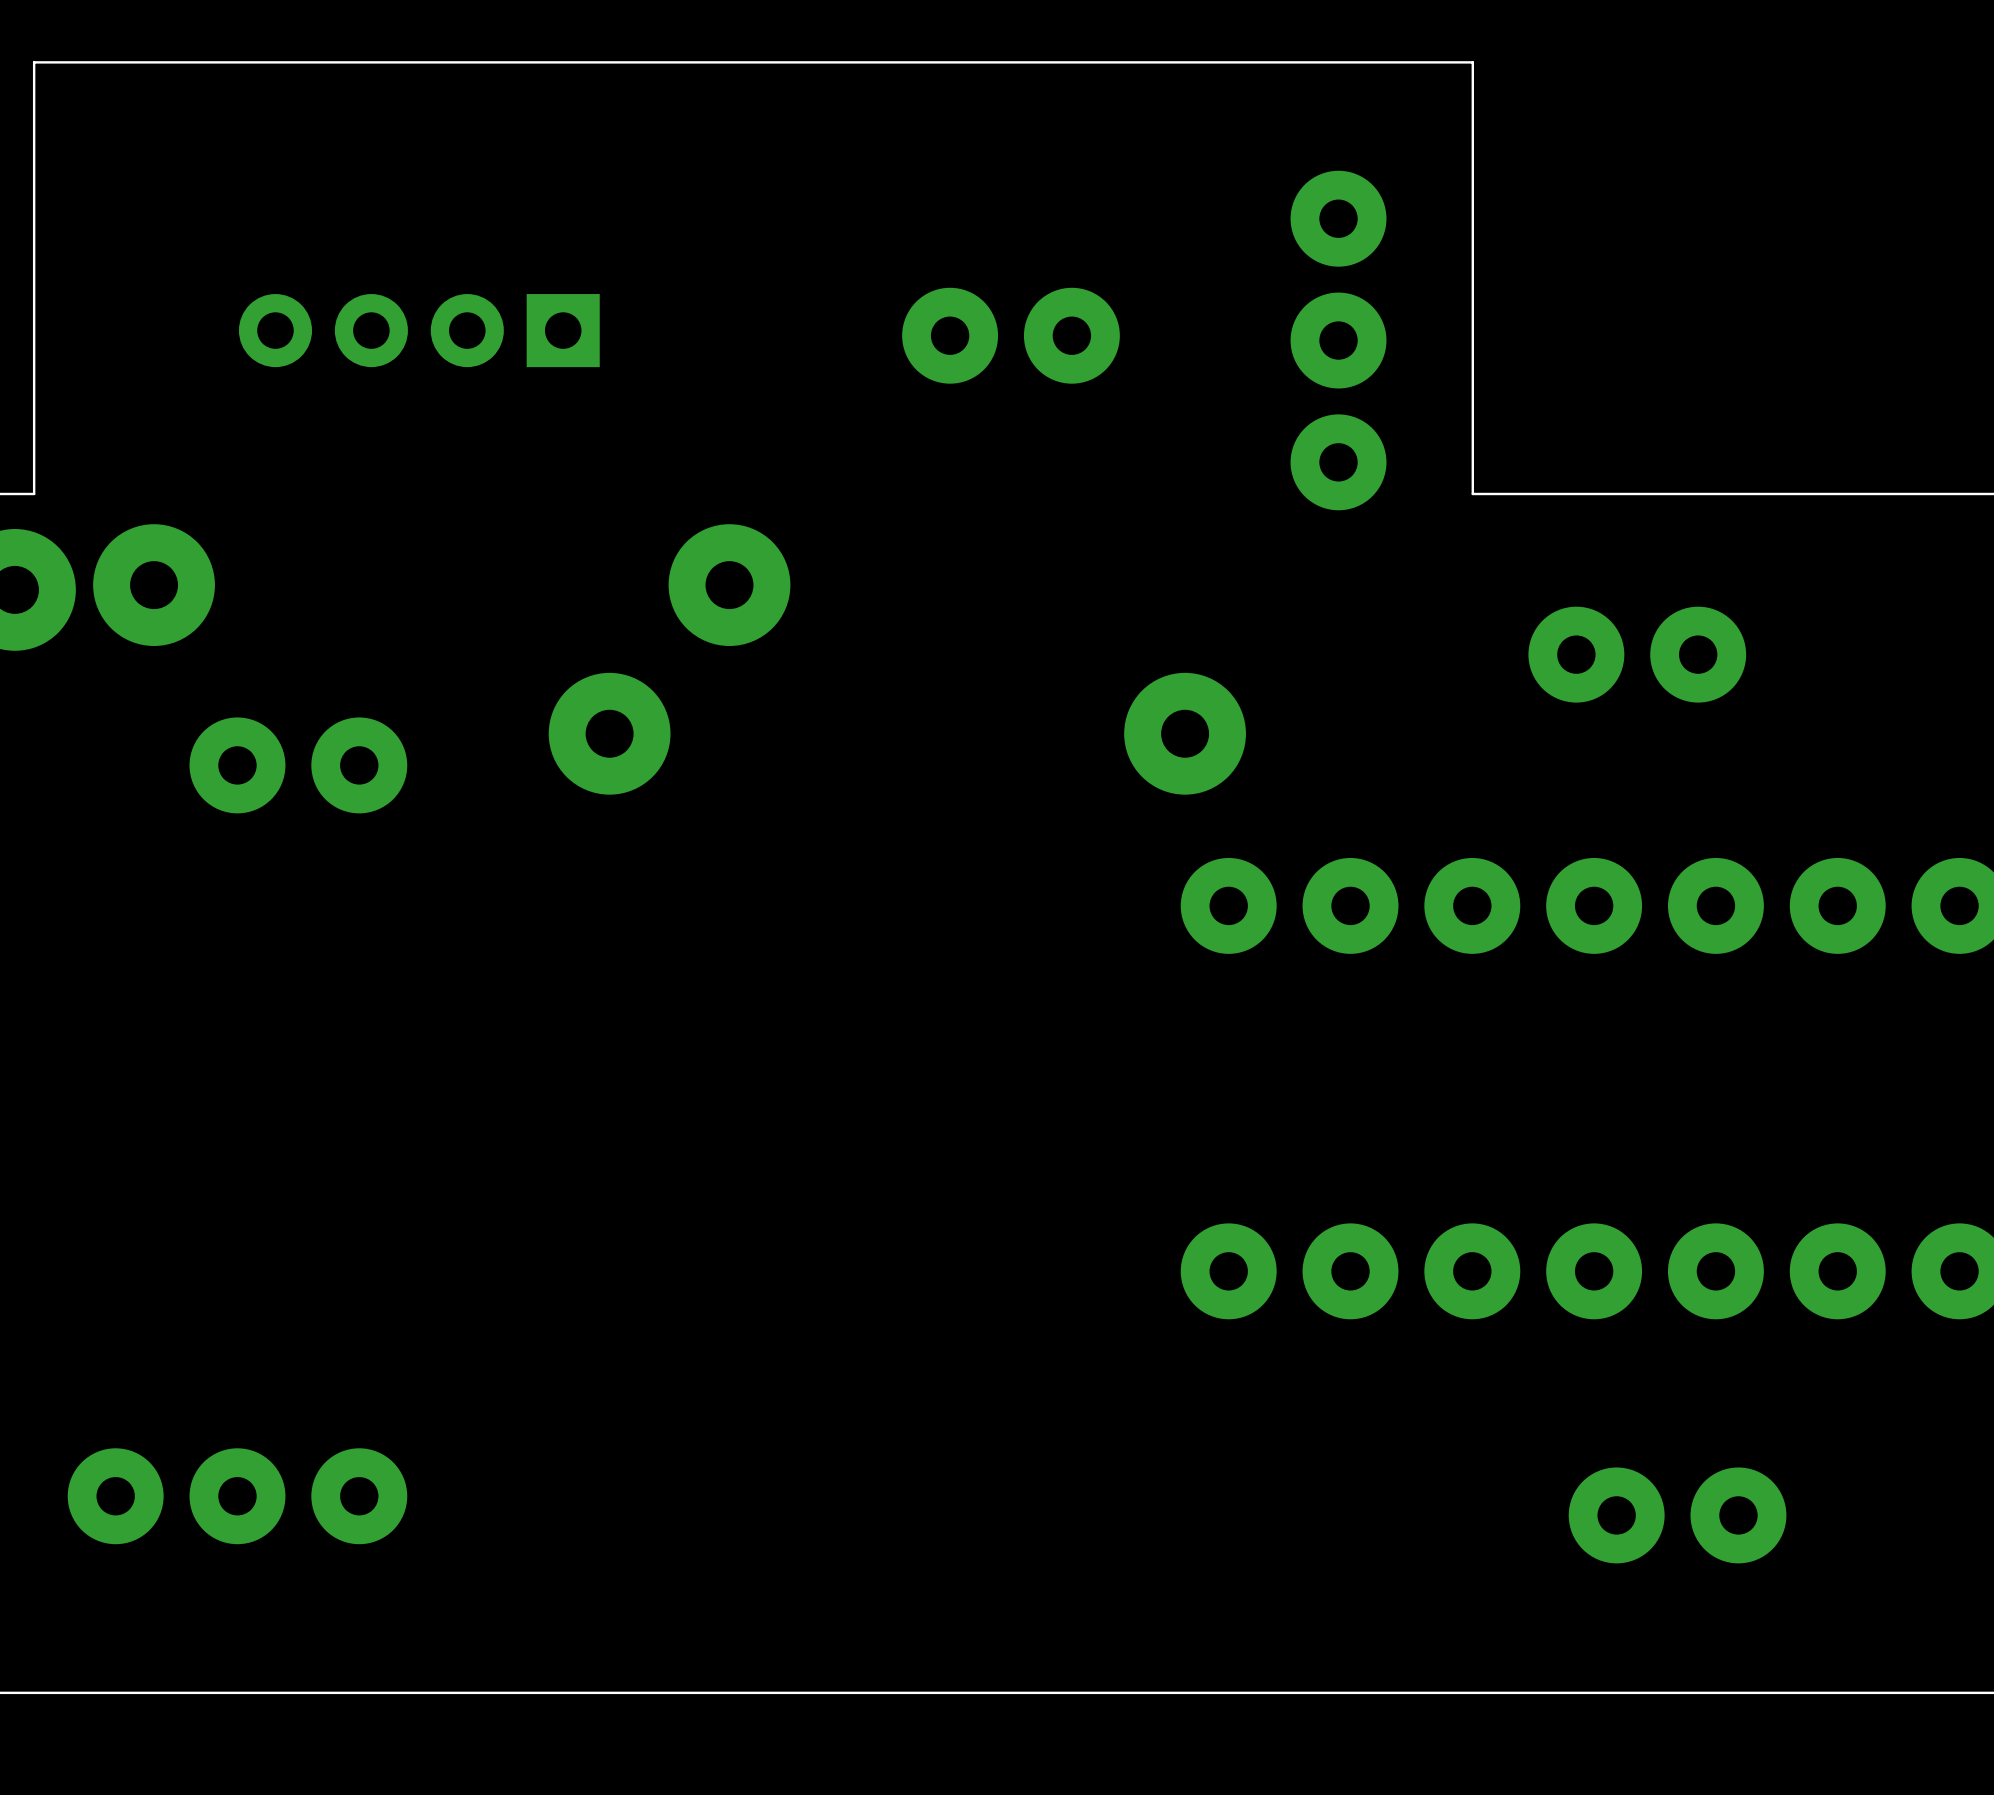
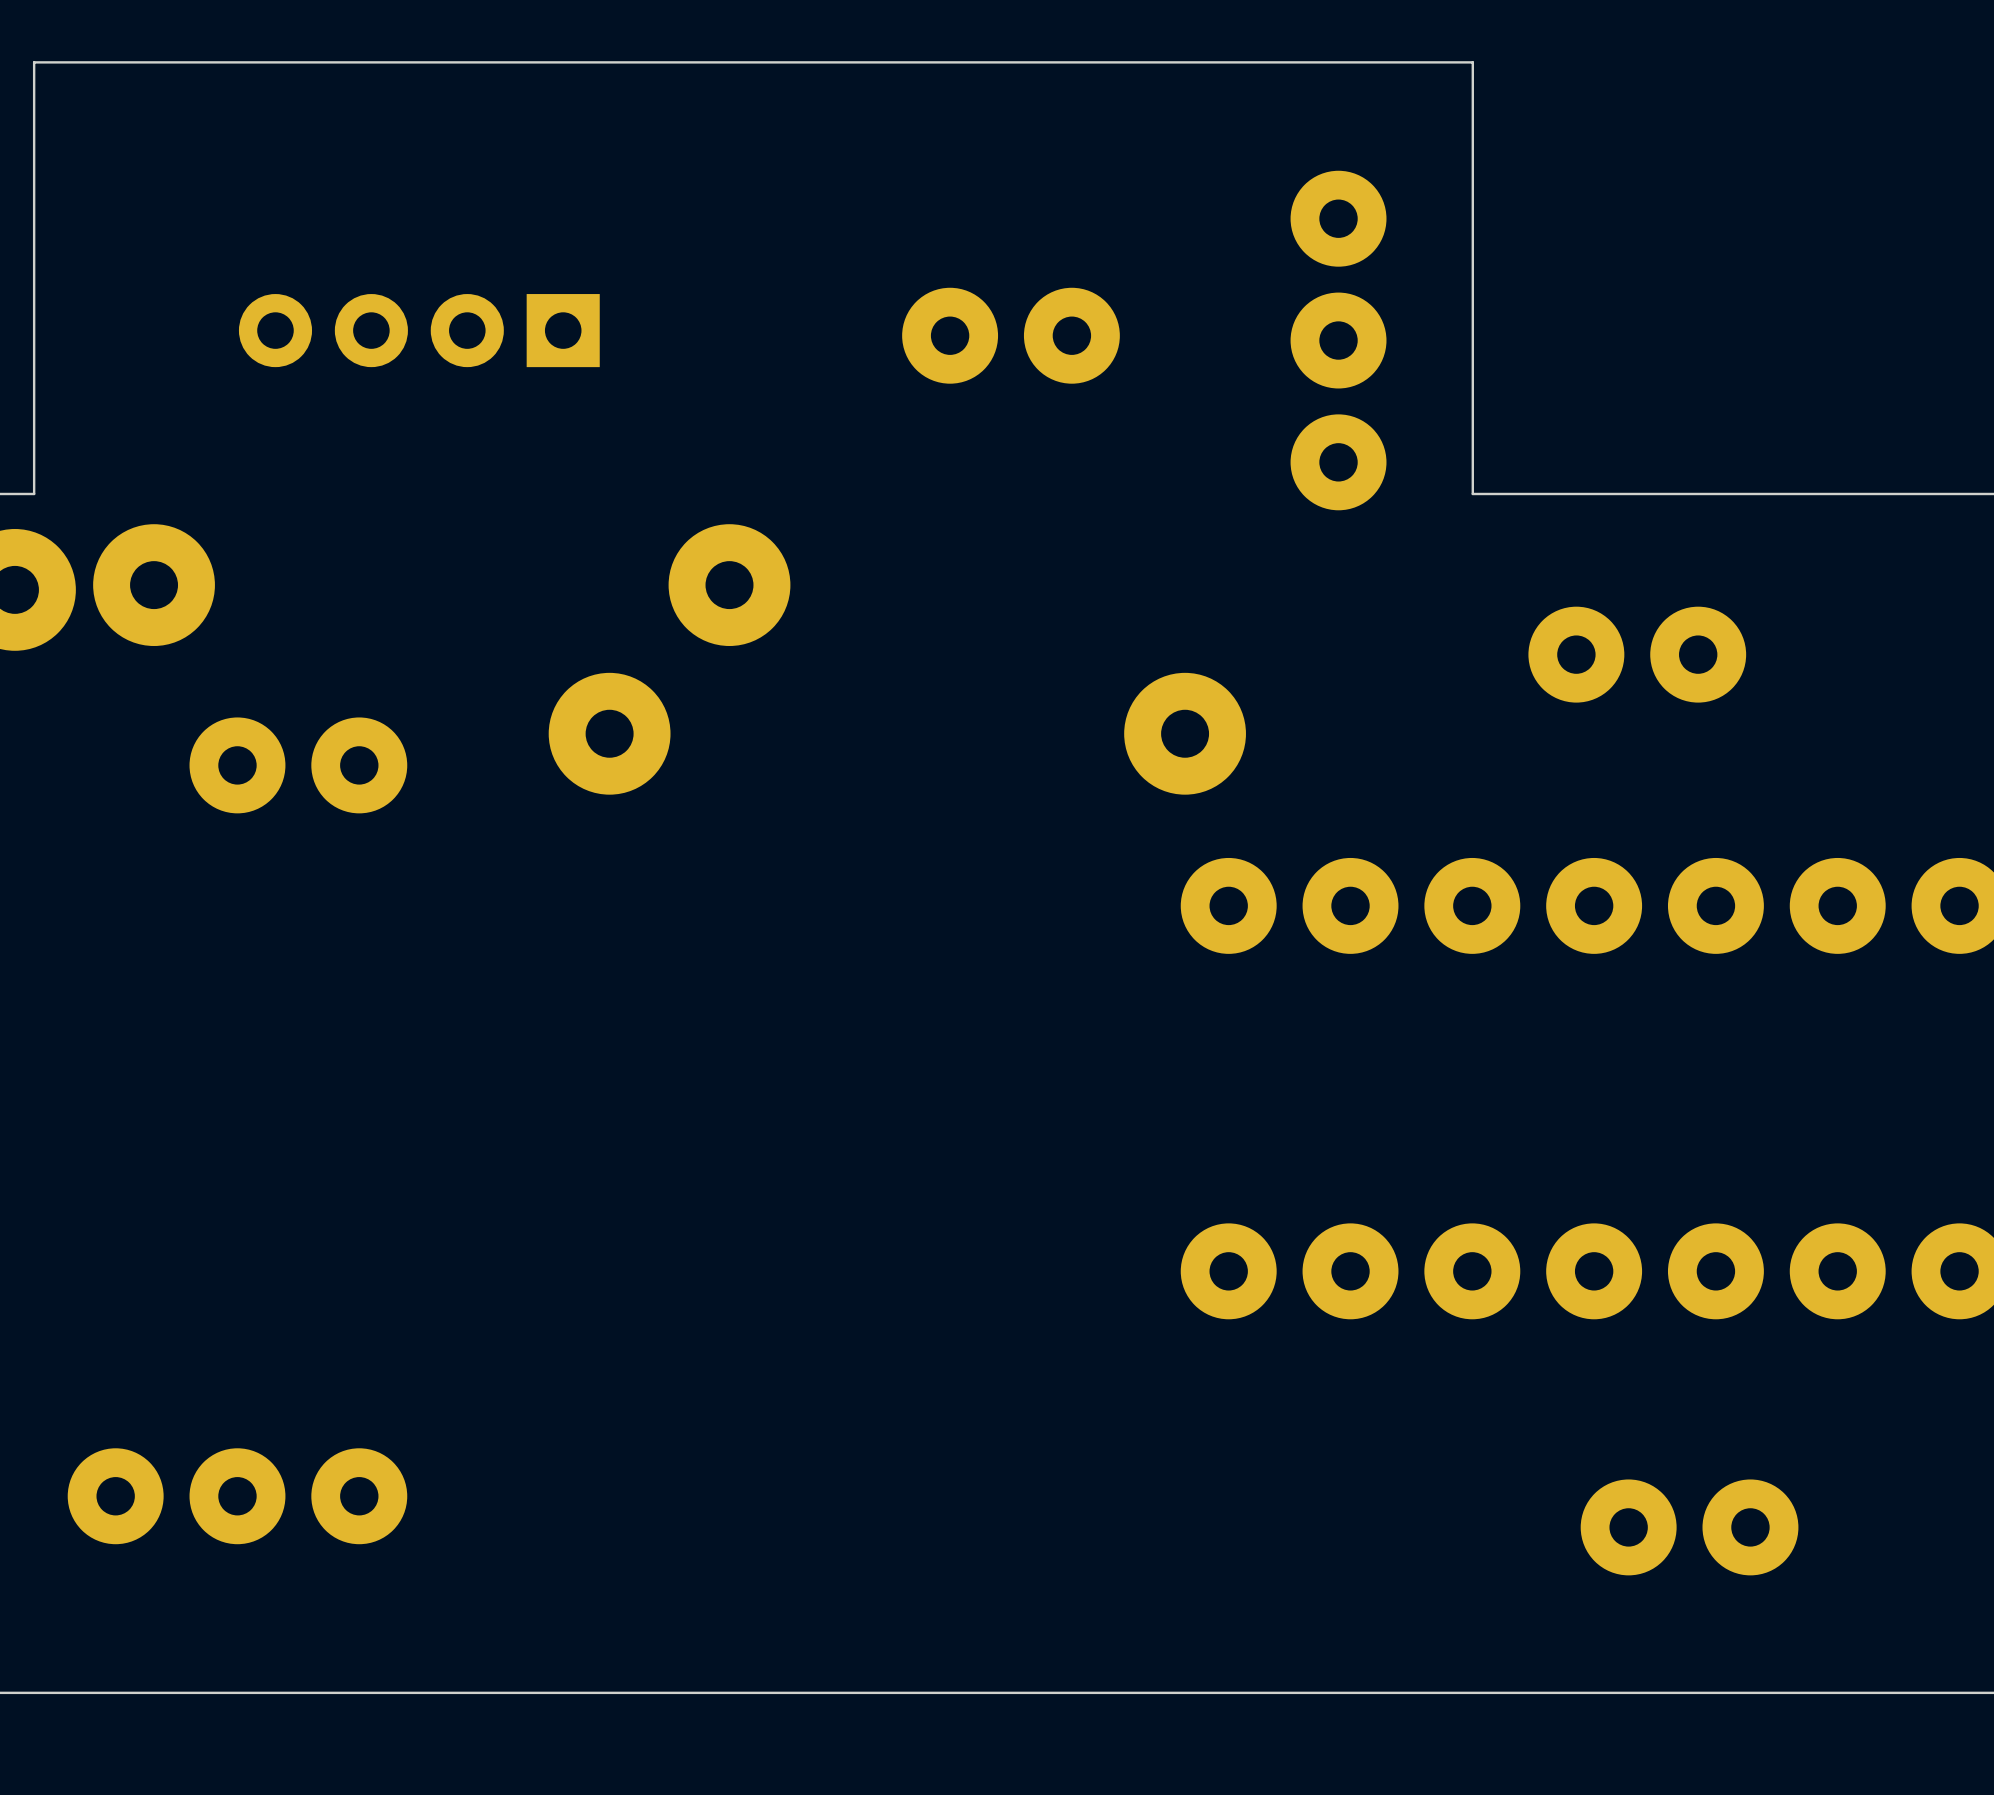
part position: (1677, 1515) -> (1689, 1527)

